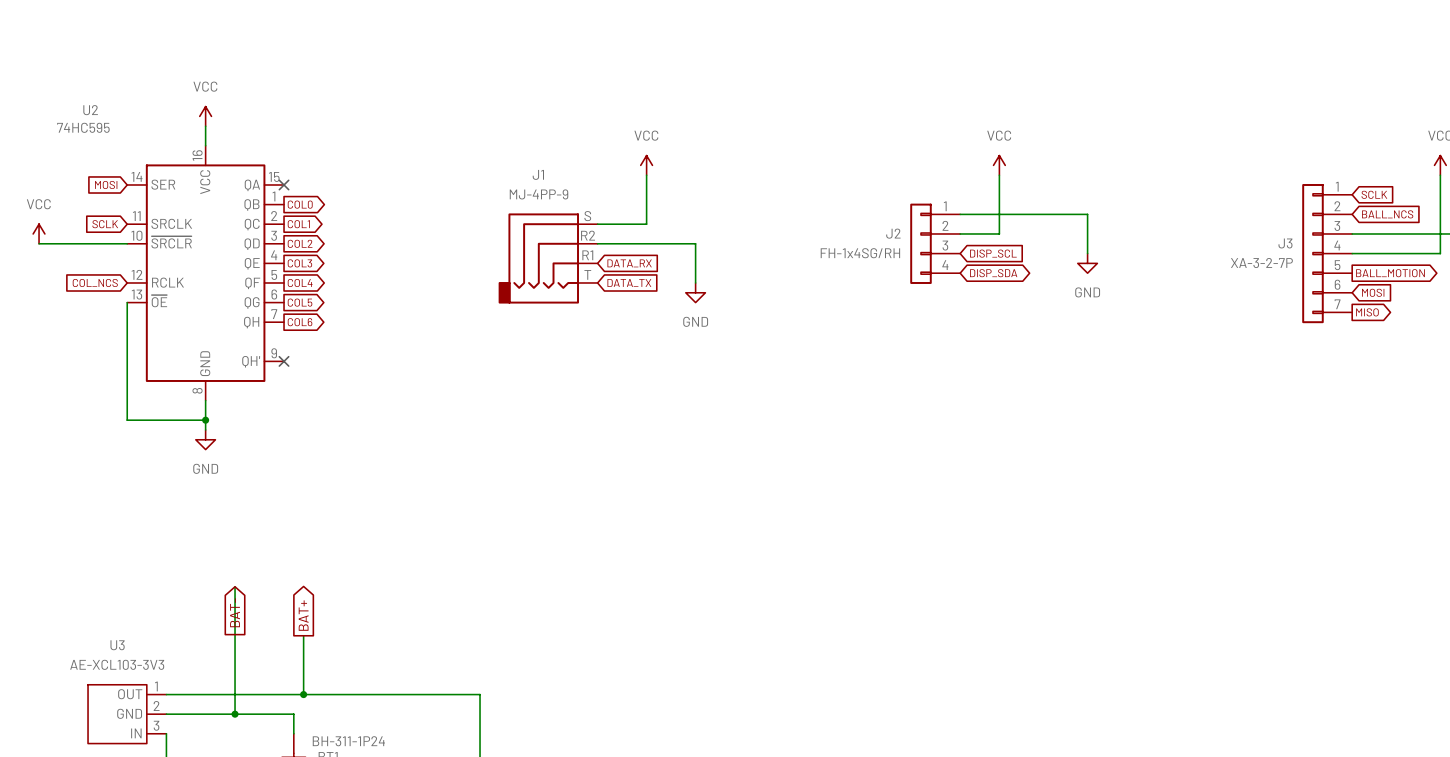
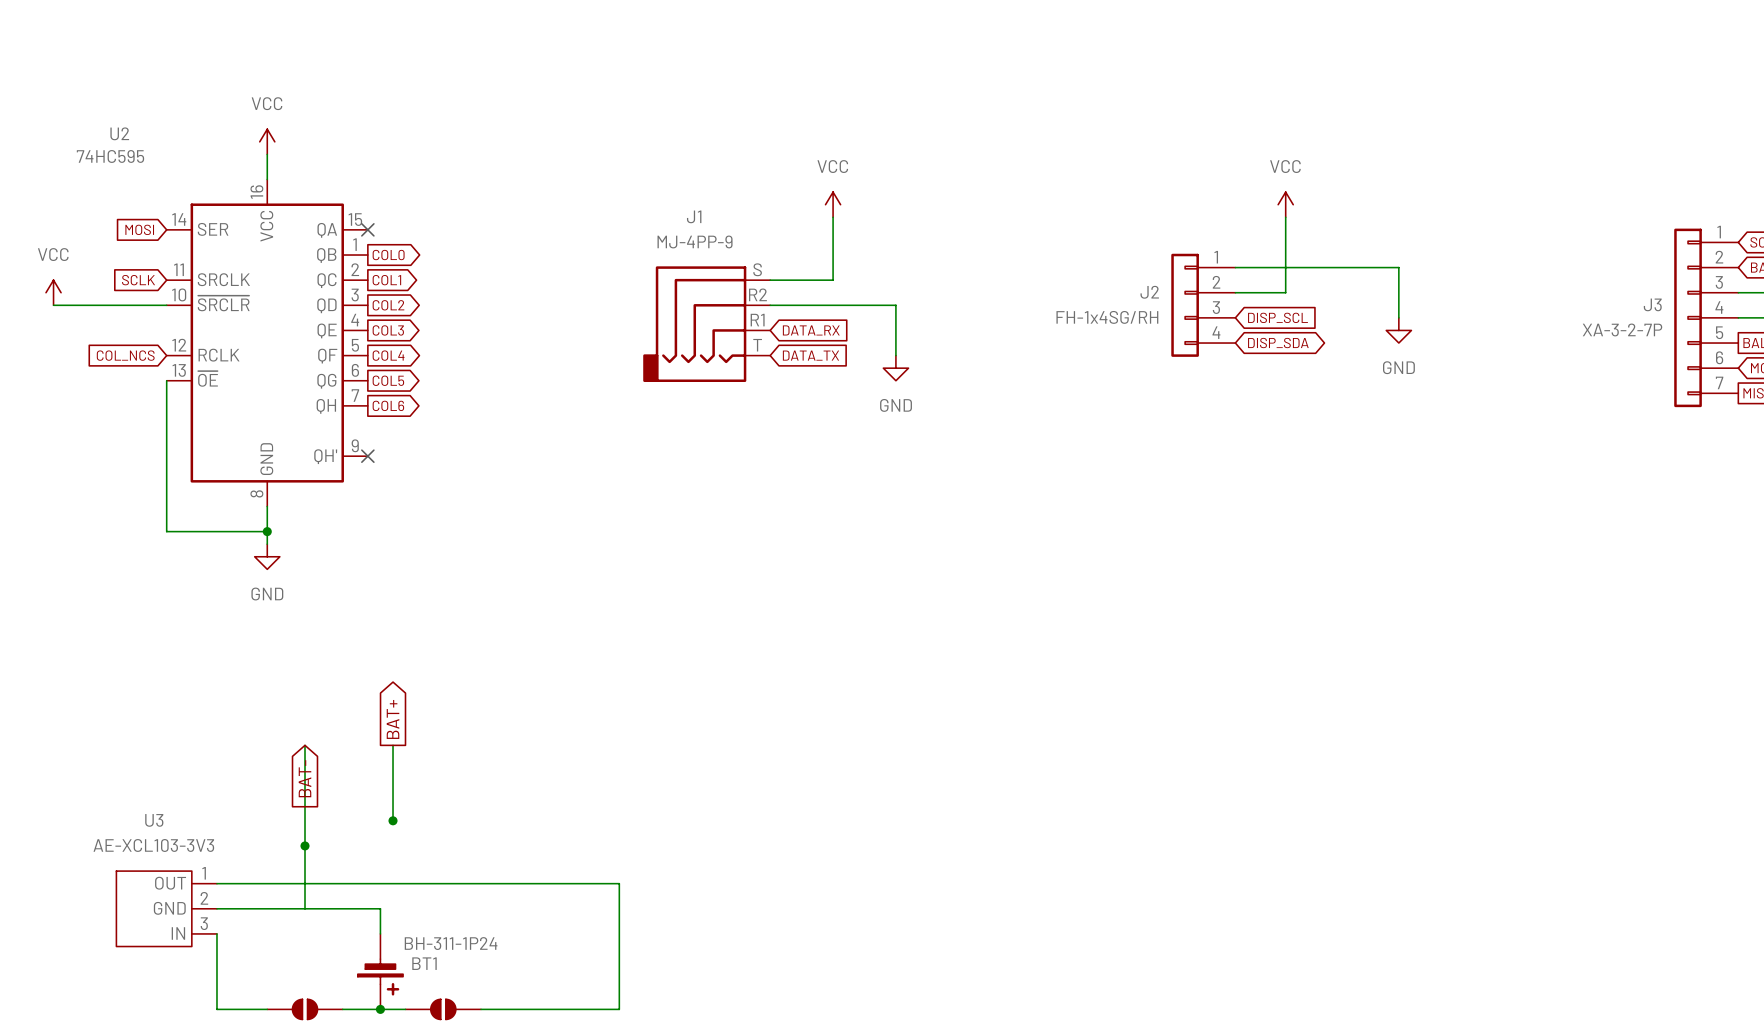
global label position: BAT+ (303, 615) -> BAT+ (393, 719)
wire: (303, 645) (303, 694) -> (393, 745) (393, 808)
junction: none -> (393, 820)
junction: none -> (305, 845)
junction: (303, 694) -> none
junction: (235, 714) -> none

